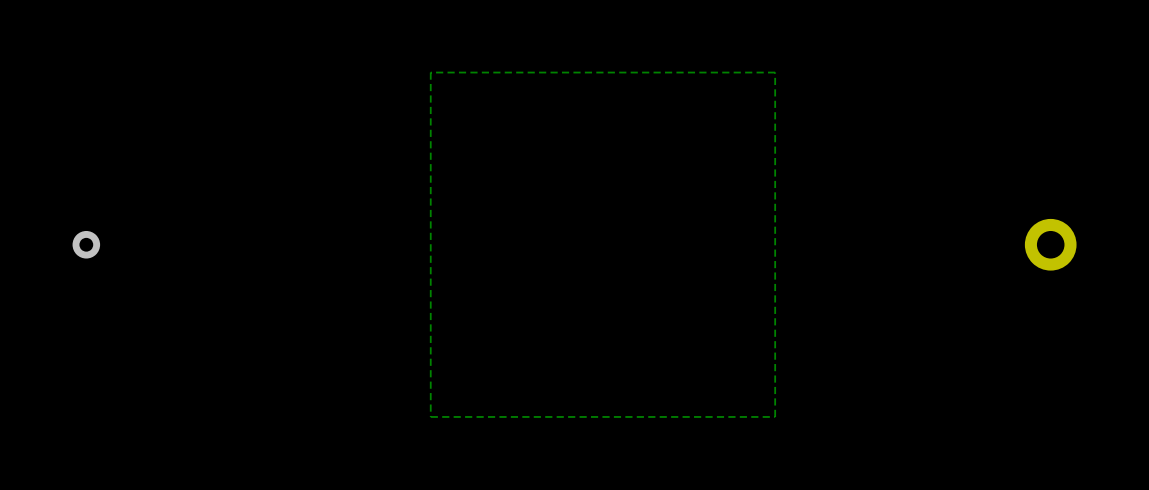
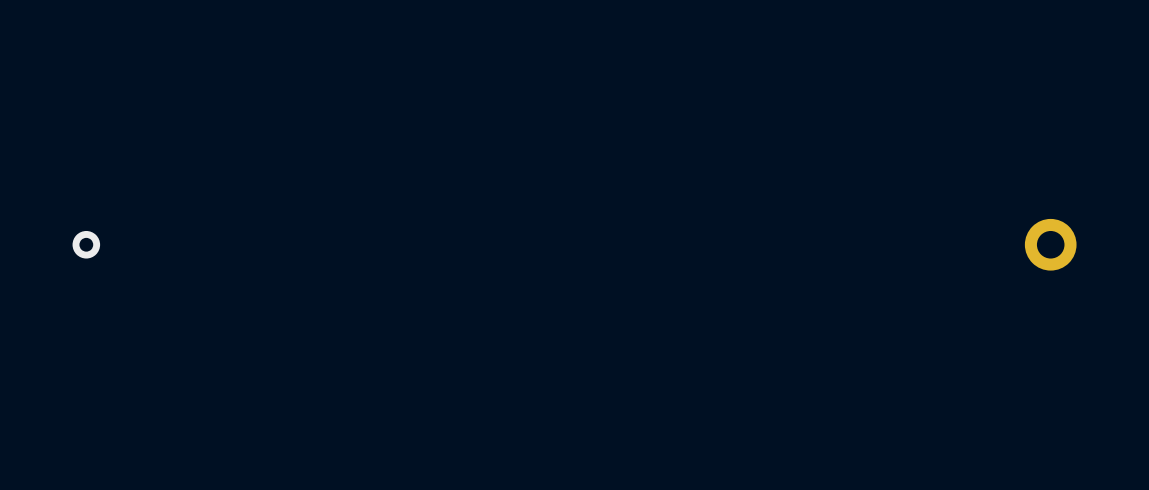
zone outline: (775, 72) (430, 72) (430, 416) (775, 416) (775, 72) -> none

